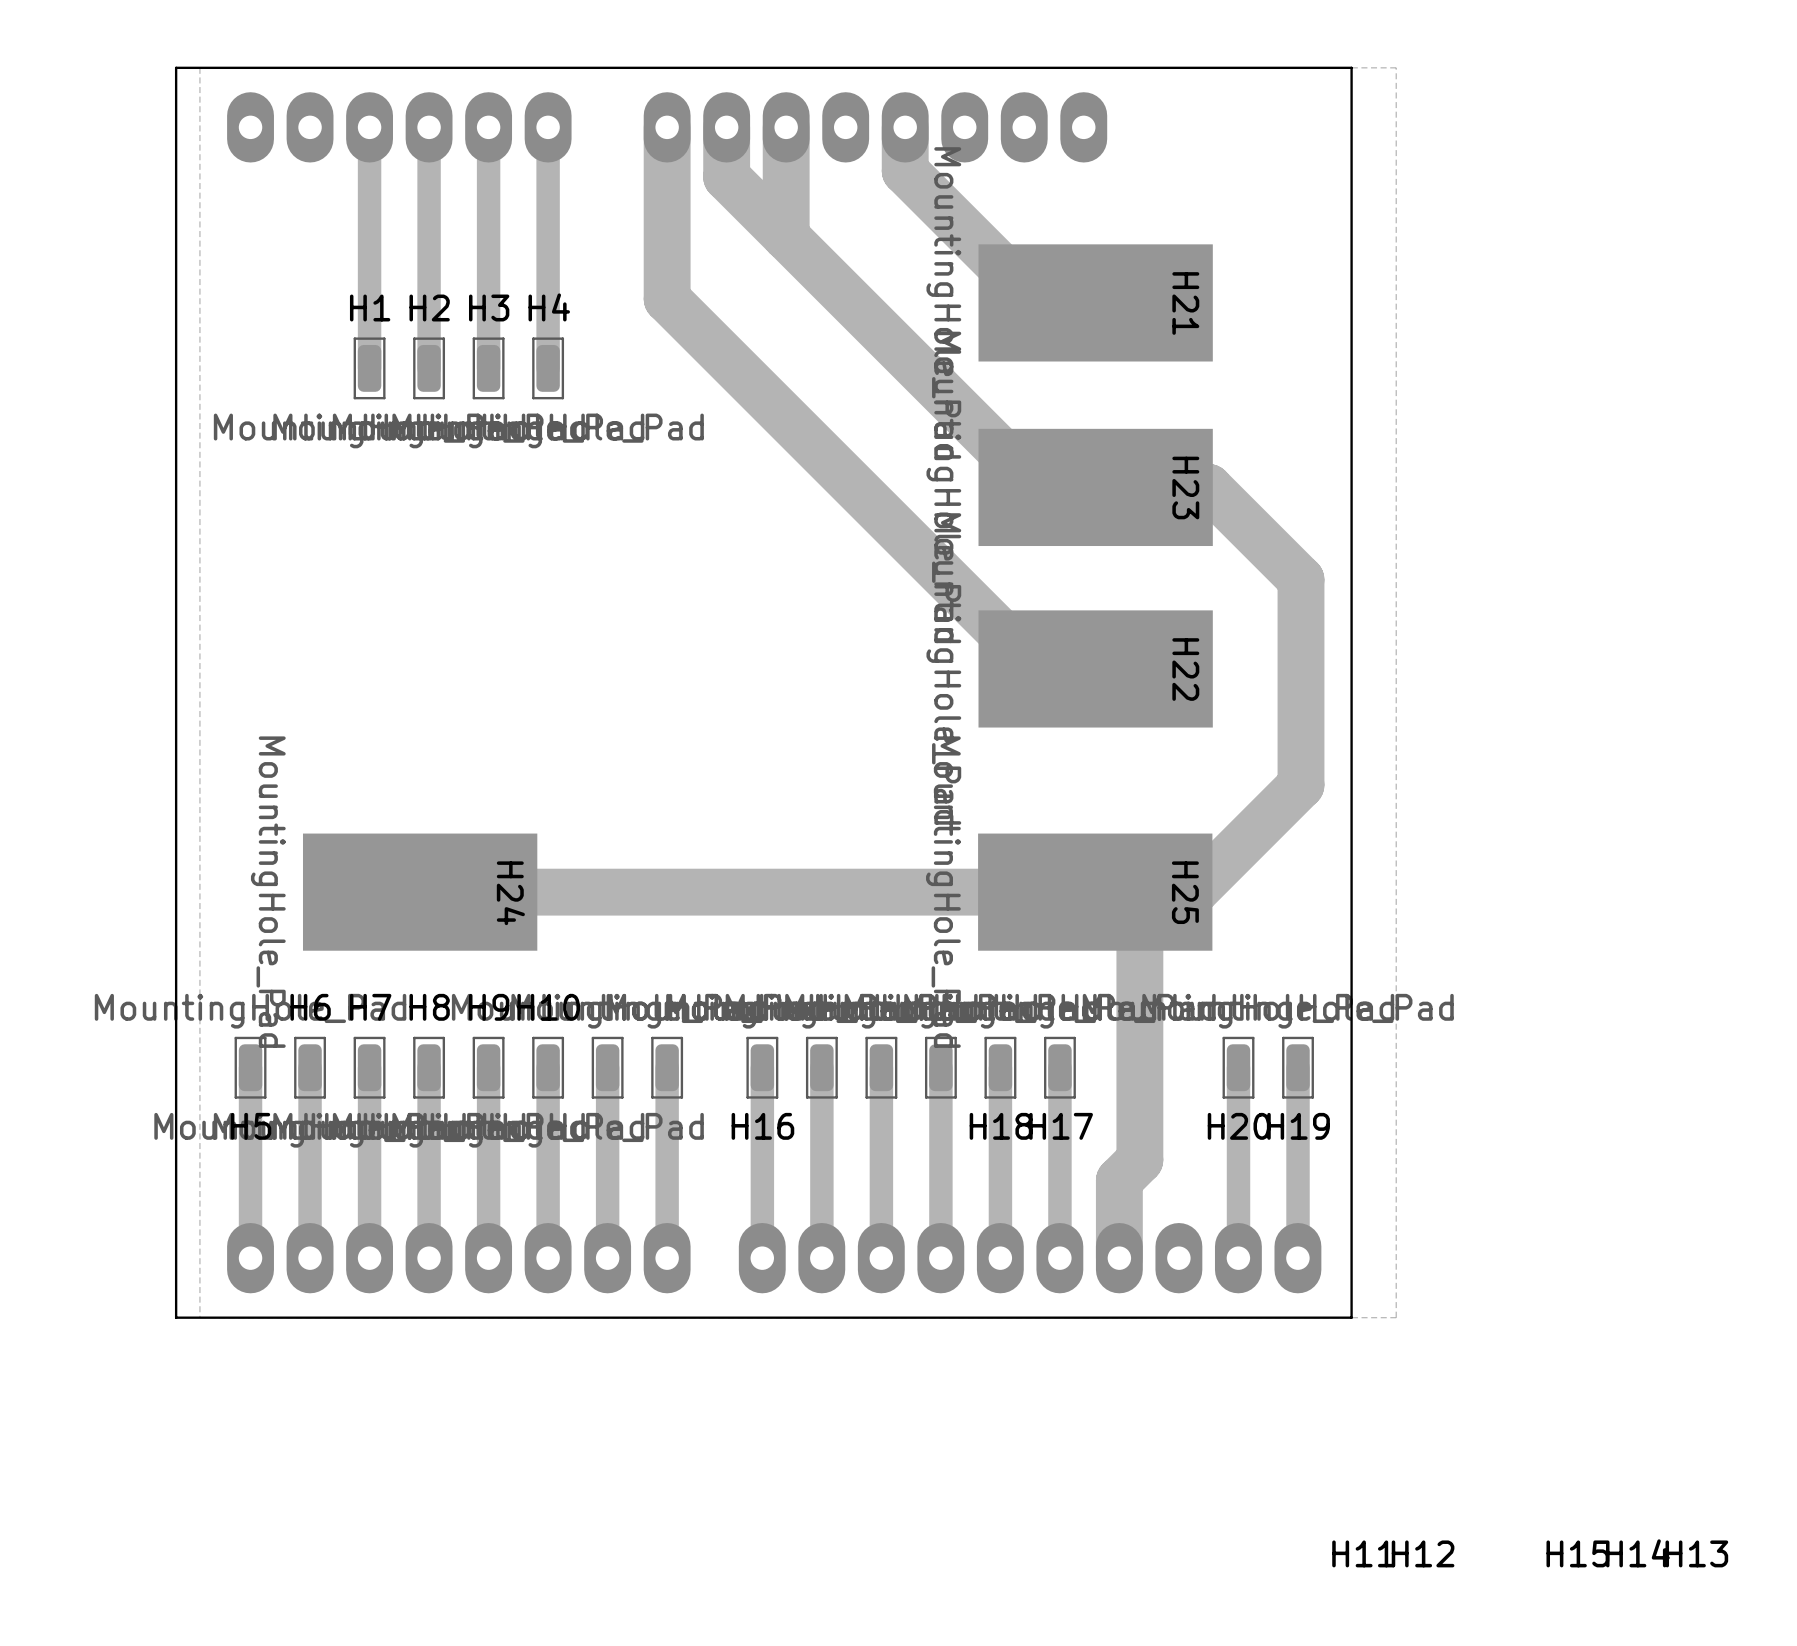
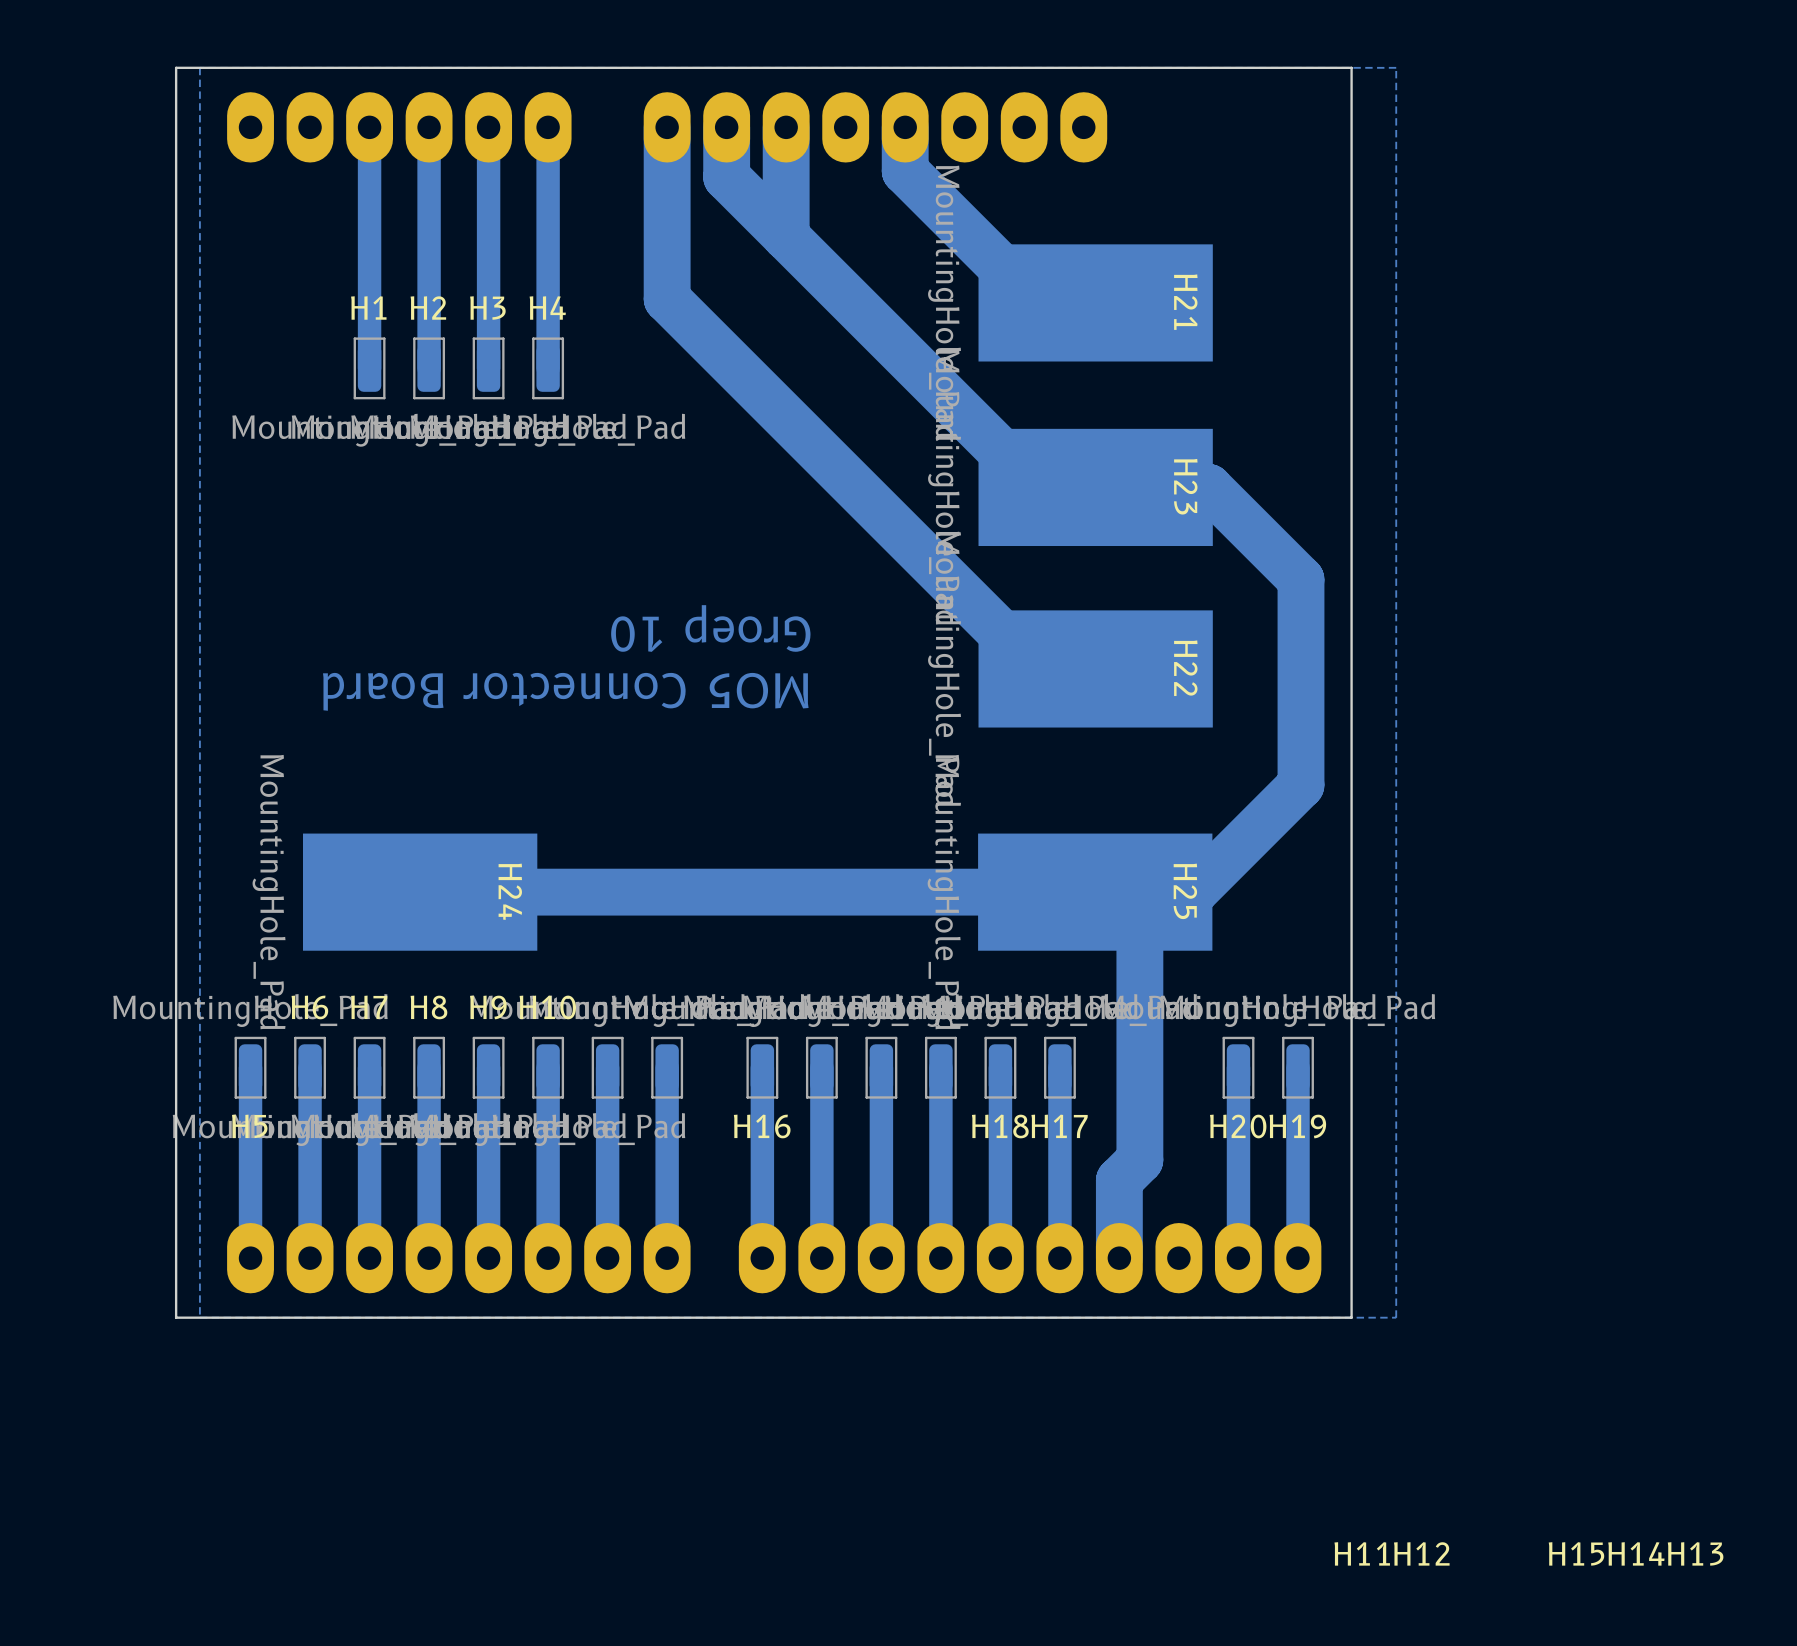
text: none -> Groep 10 (710, 628)
text: none -> MO5 Connector Board (565, 691)

